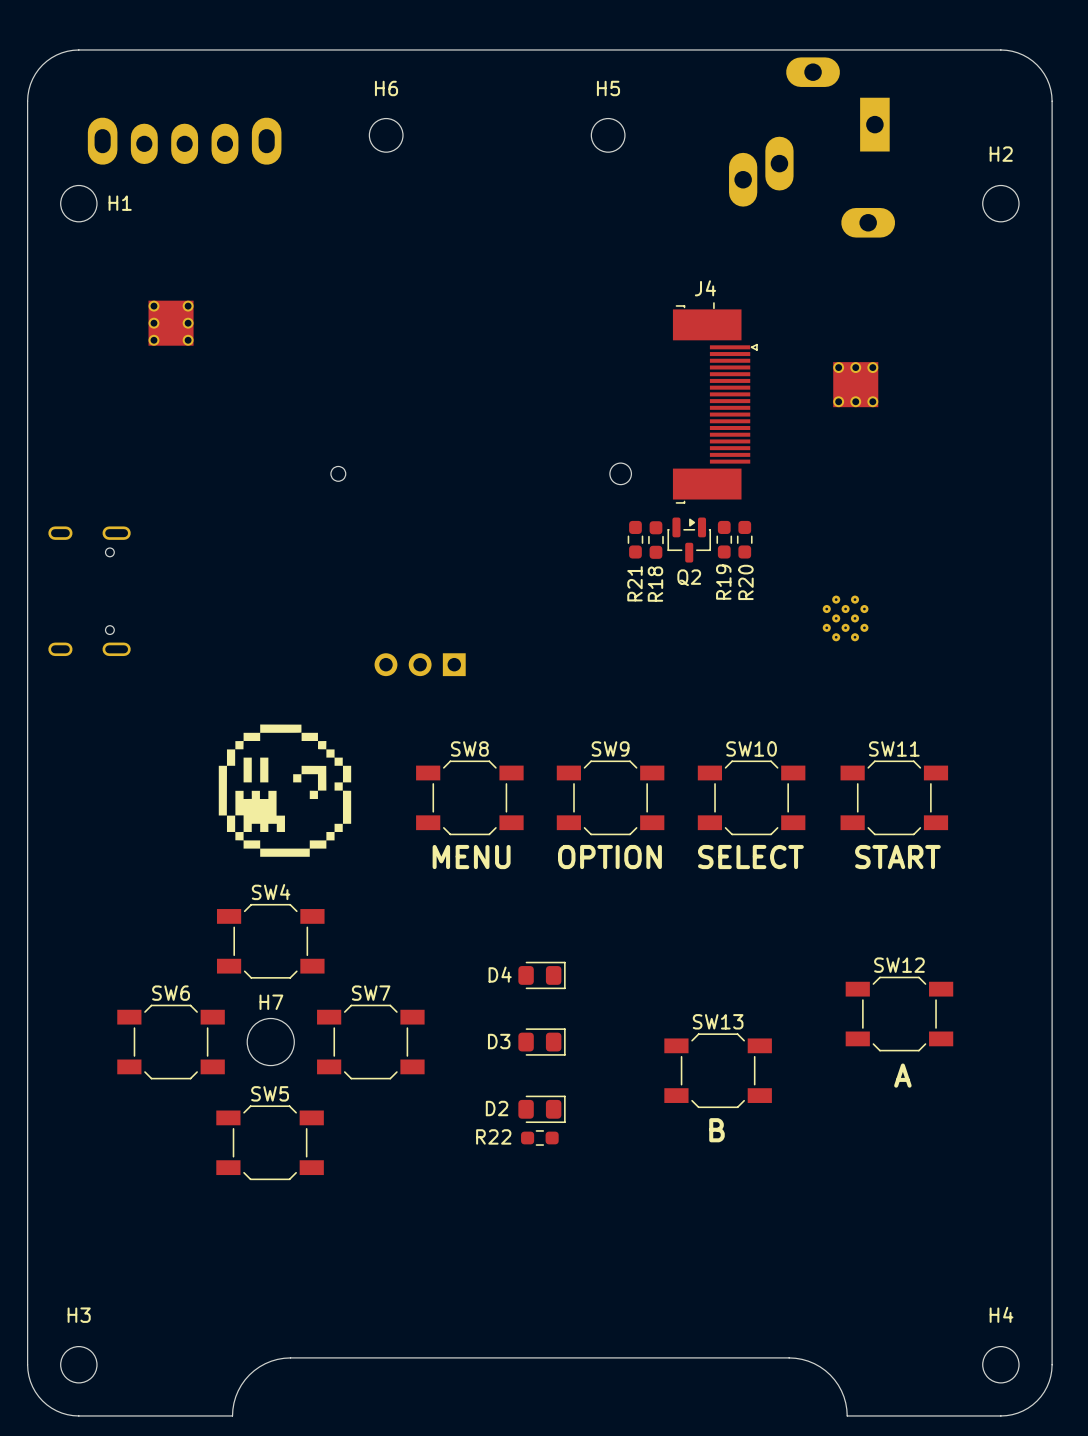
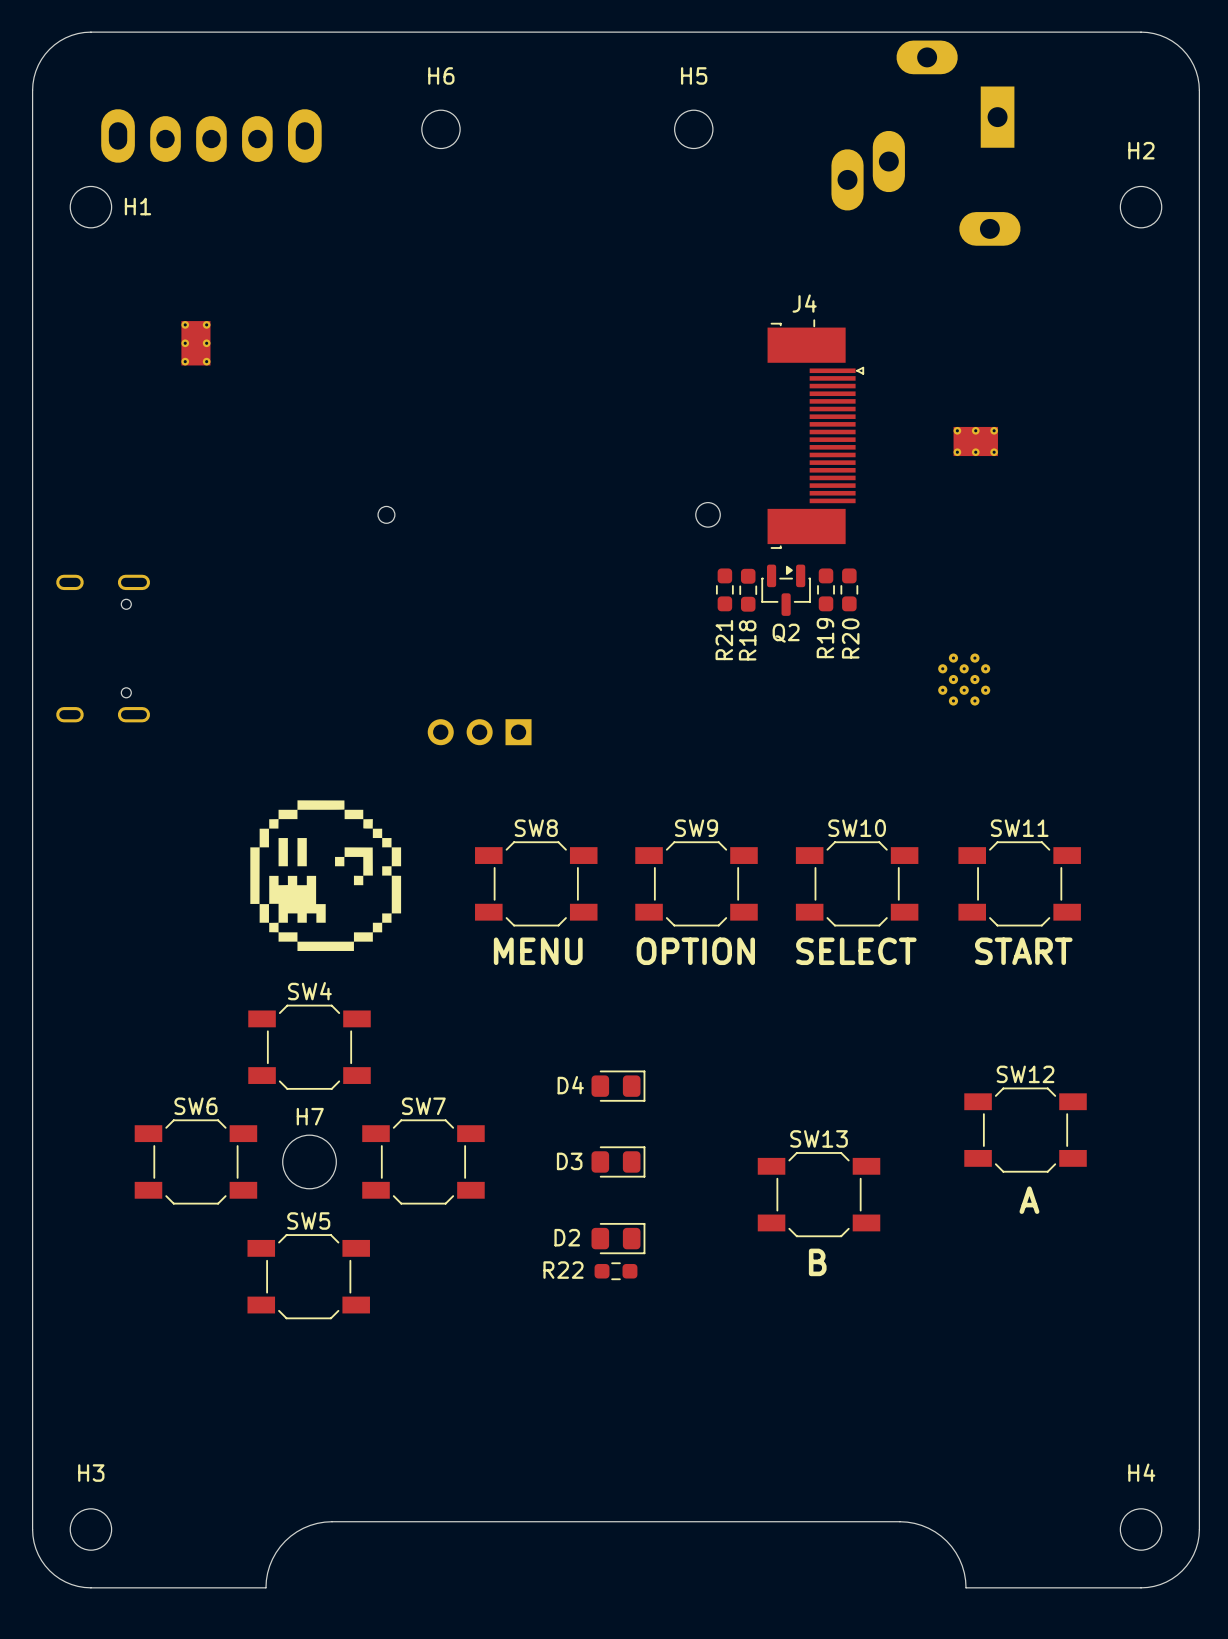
part footprint: [148, 300, 194, 346] -> [181, 321, 211, 366]
part: (855, 384) -> none
part: none -> (975, 441)

